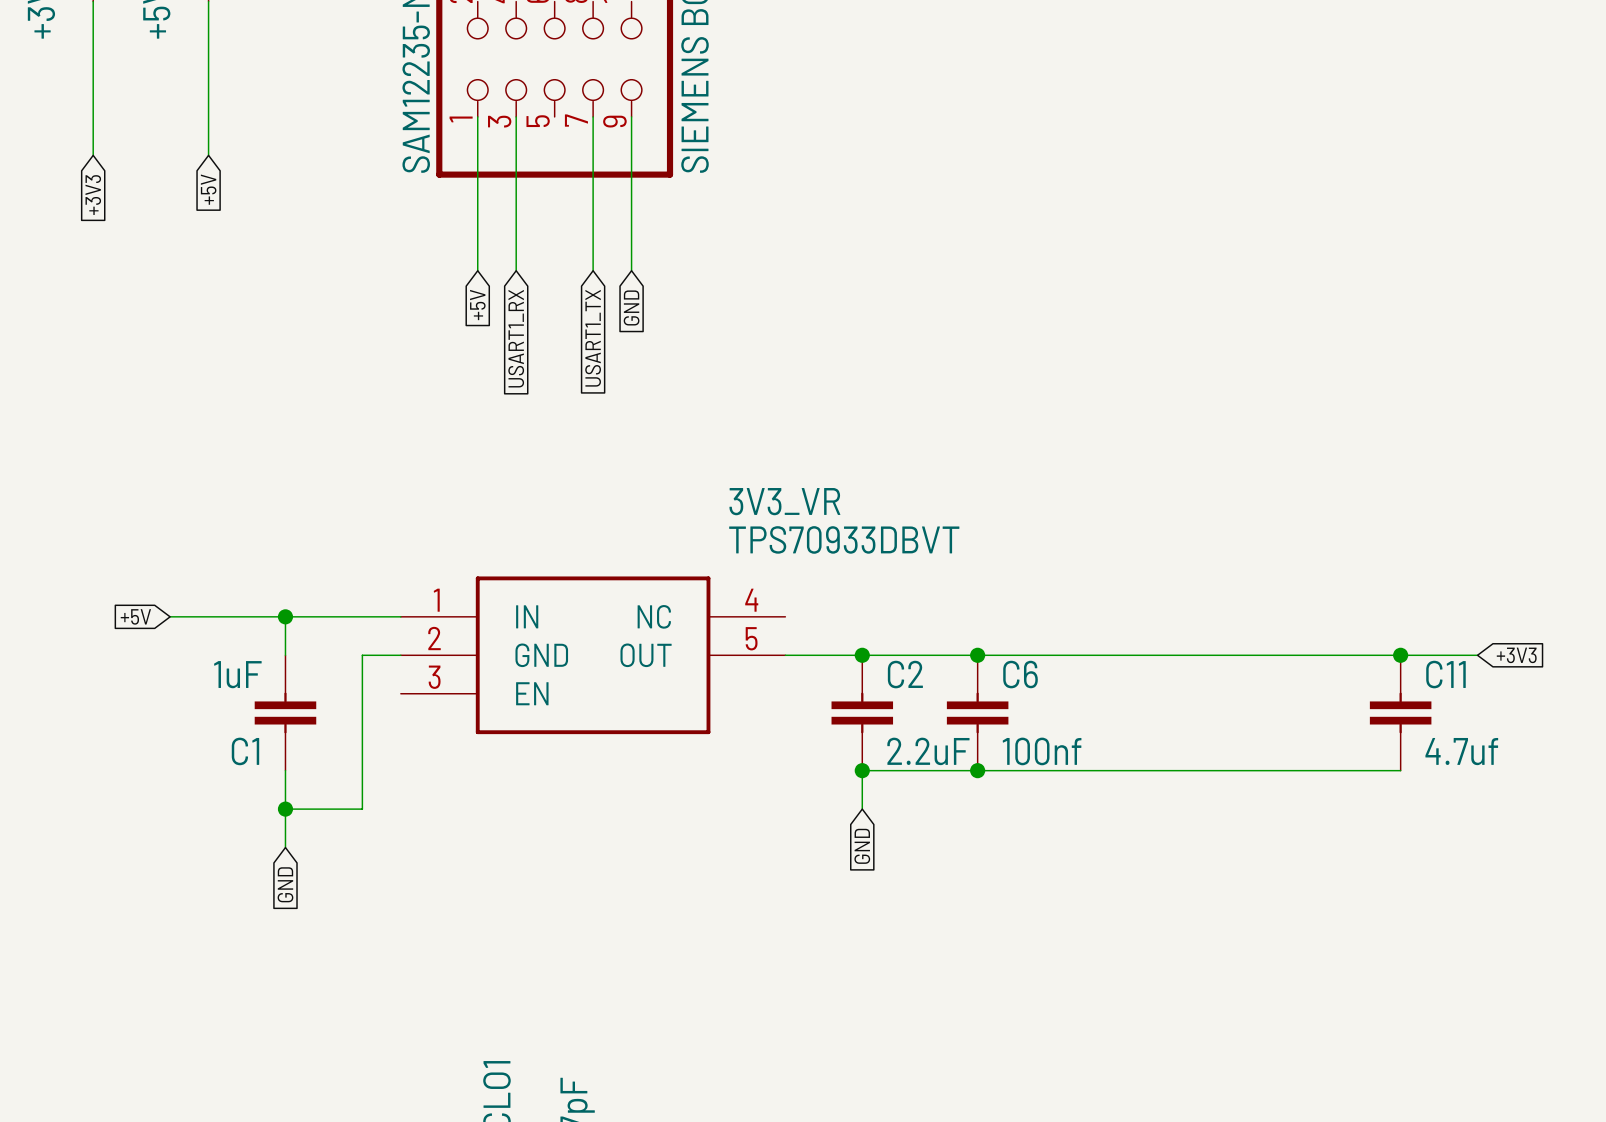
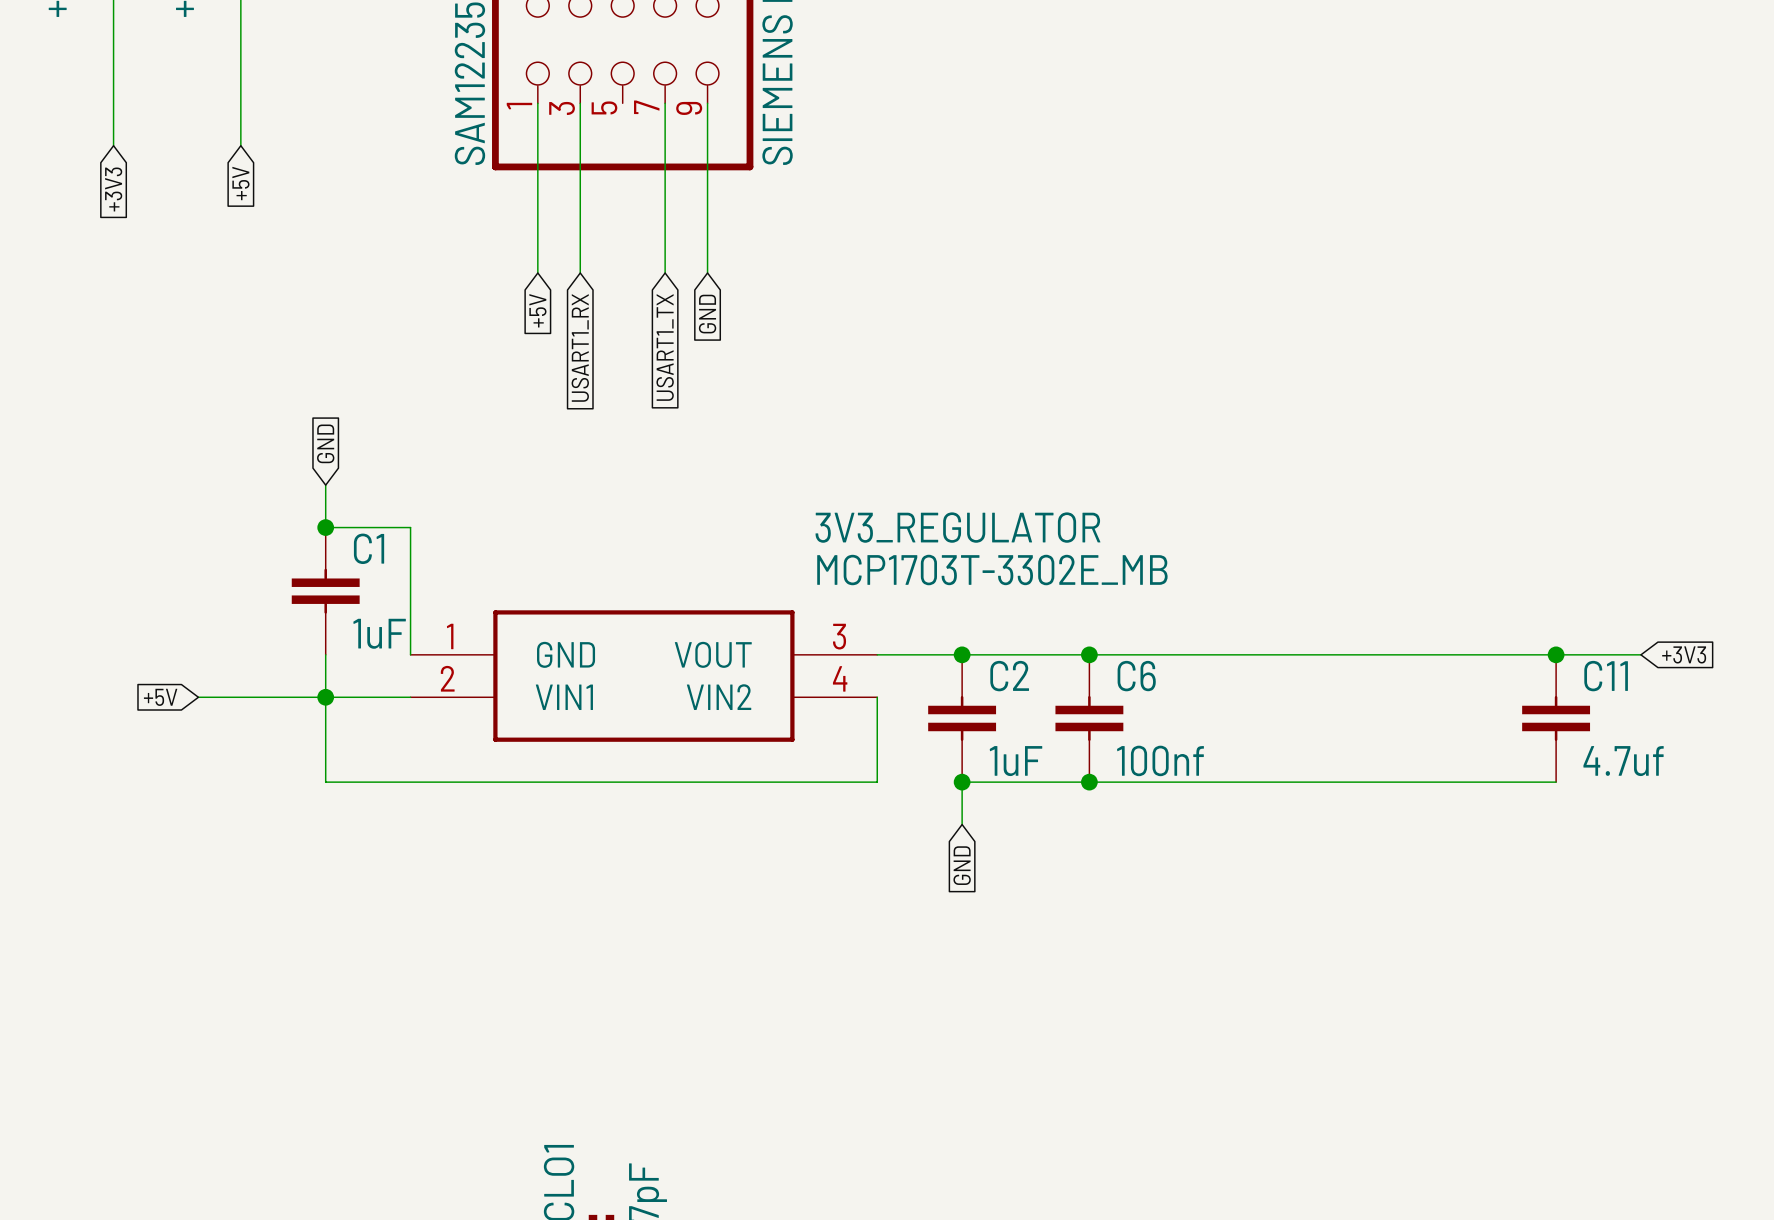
global label: none -> GND (325, 443)
wire: none -> (325, 485) (325, 527) (410, 527) (410, 654)
junction: none -> (325, 527)
global label position: +5V (135, 616) -> +5V (160, 697)
wire: (170, 616) (400, 616) -> none
junction position: (285, 616) -> (325, 697)
wire: none -> (877, 654) (1640, 654)
junction: none -> (962, 654)
junction: none -> (1089, 654)
3V3_REGULATOR: none -> MCP1703T-3302E_MB (643, 676)
wire: none -> (198, 697) (410, 697)
wire: (400, 655) (362, 655) (362, 809) (285, 809) -> none
3V3_VR: TPS70933DBVT (593, 655) -> none
wire: (785, 655) (1477, 655) -> (877, 697) (877, 782) (325, 782) (325, 697)
junction: (862, 655) -> none
junction: (977, 655) -> none
junction position: (1400, 655) -> (1556, 654)
global label position: +3V3 (1516, 655) -> +3V3 (1684, 654)
C1 value position: 1uF (237, 674) -> 1uF (379, 633)
C1 position: (285, 712) -> (325, 591)
C2 position: (862, 712) -> (962, 718)
C6 position: (977, 712) -> (1089, 718)
C11 position: (1400, 712) -> (1556, 718)
junction: none -> (962, 782)
junction: none -> (1089, 782)
C1 name position: C1 (245, 751) -> C1 (369, 548)
C2 value: 2.2uF (928, 751) -> 1uF (1016, 761)
wire: (285, 770) (285, 847) -> none
junction: (862, 770) -> none
junction: (977, 770) -> none
wire: (1400, 770) (862, 770) (862, 809) -> (1556, 782) (962, 782) (962, 824)
junction: (285, 809) -> none
global label position: GND (862, 846) -> GND (962, 865)
global label: GND (285, 884) -> none

